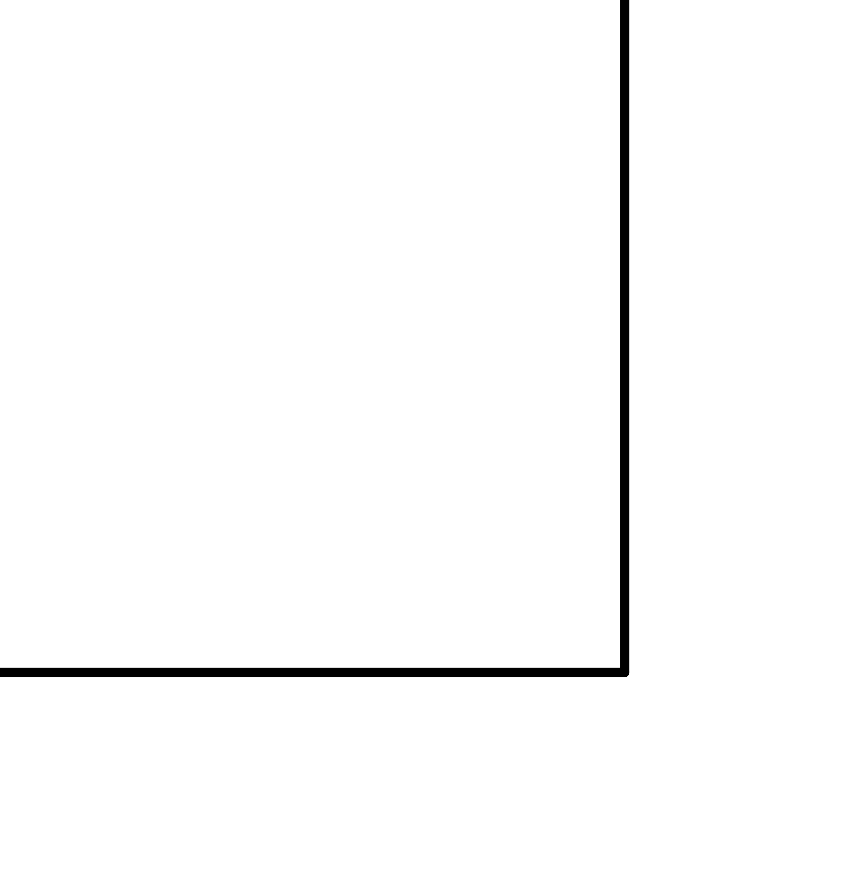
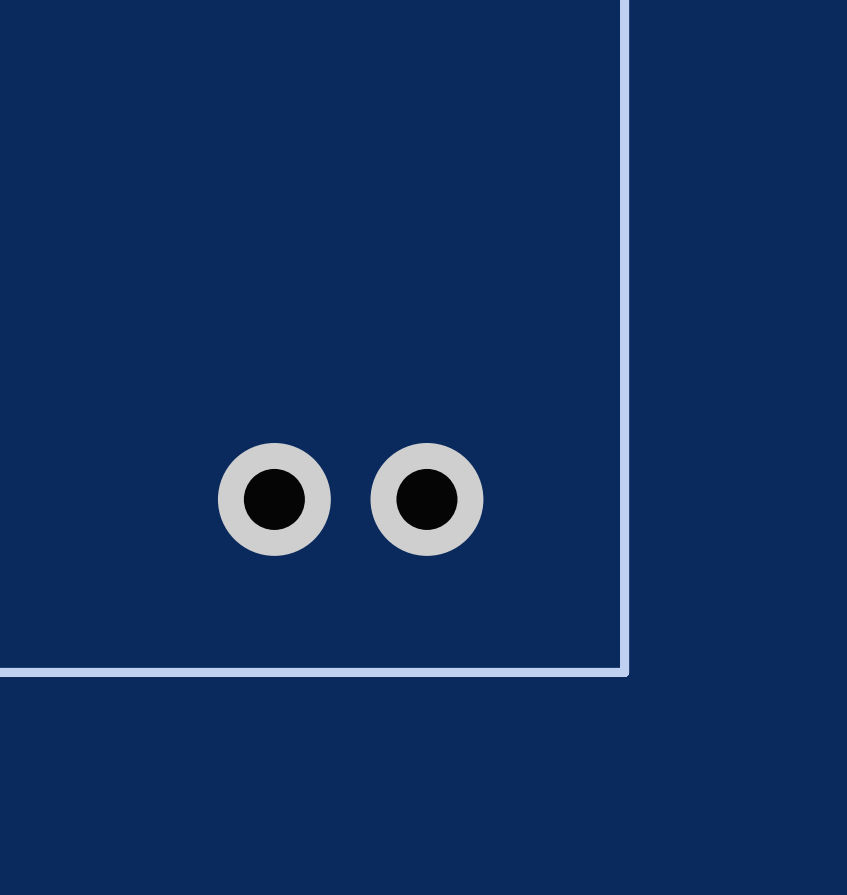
part: none -> (350, 499)

